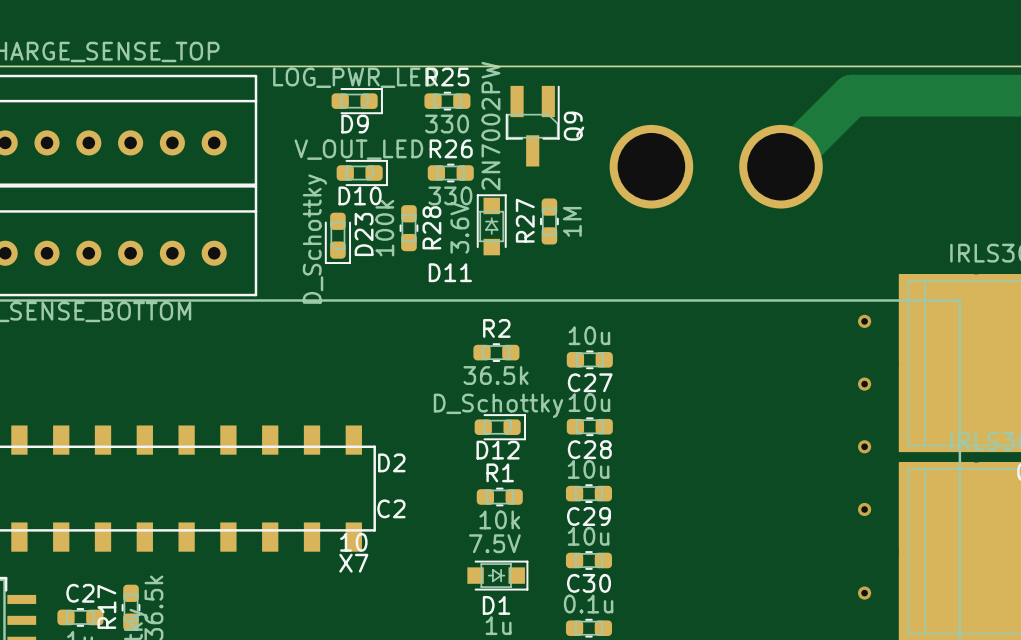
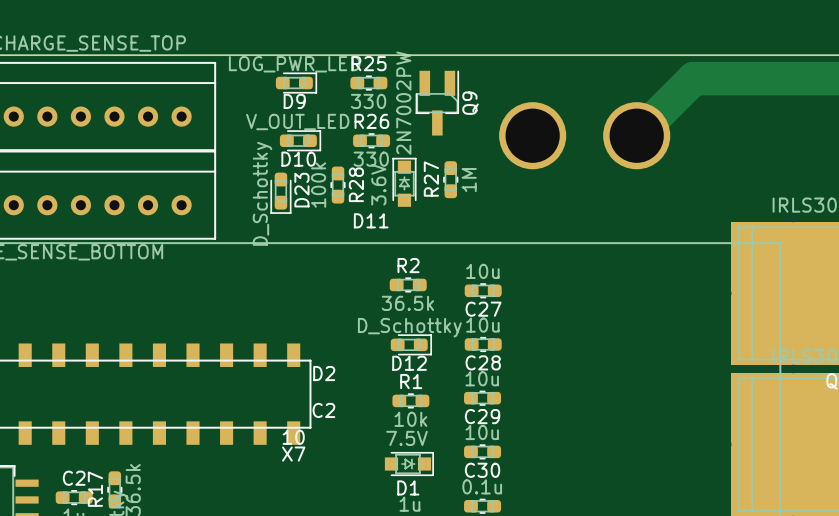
via: (864, 321) -> none
via: (864, 384) -> none
via: (864, 446) -> none
via: (864, 509) -> none
via: (864, 593) -> none

